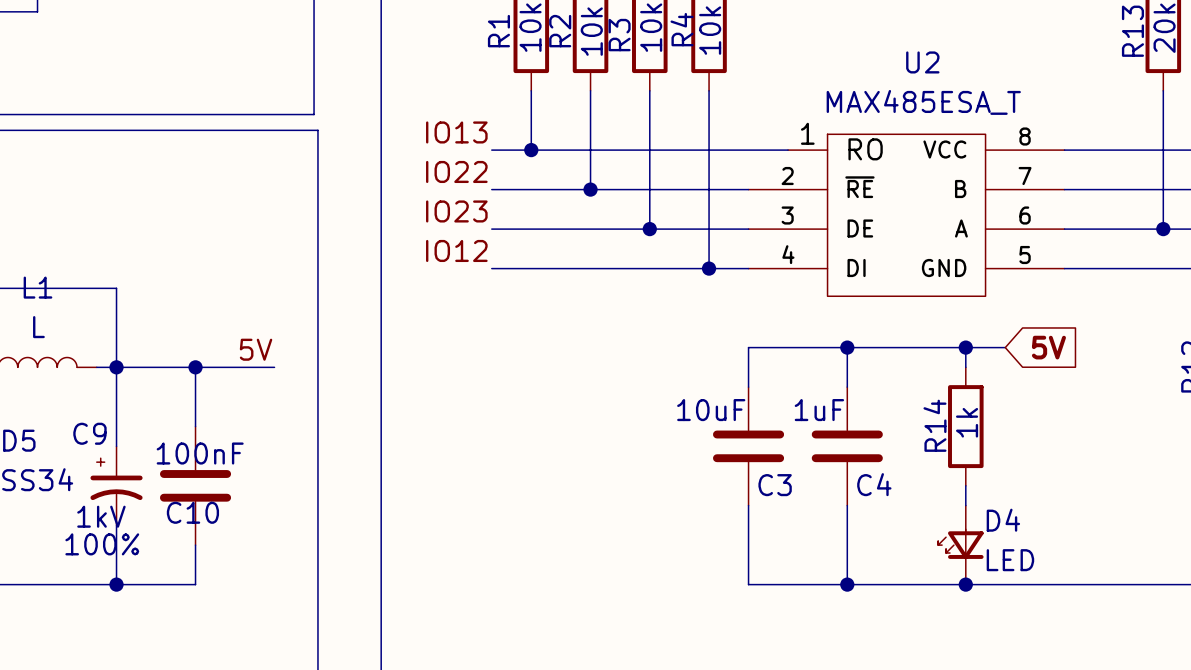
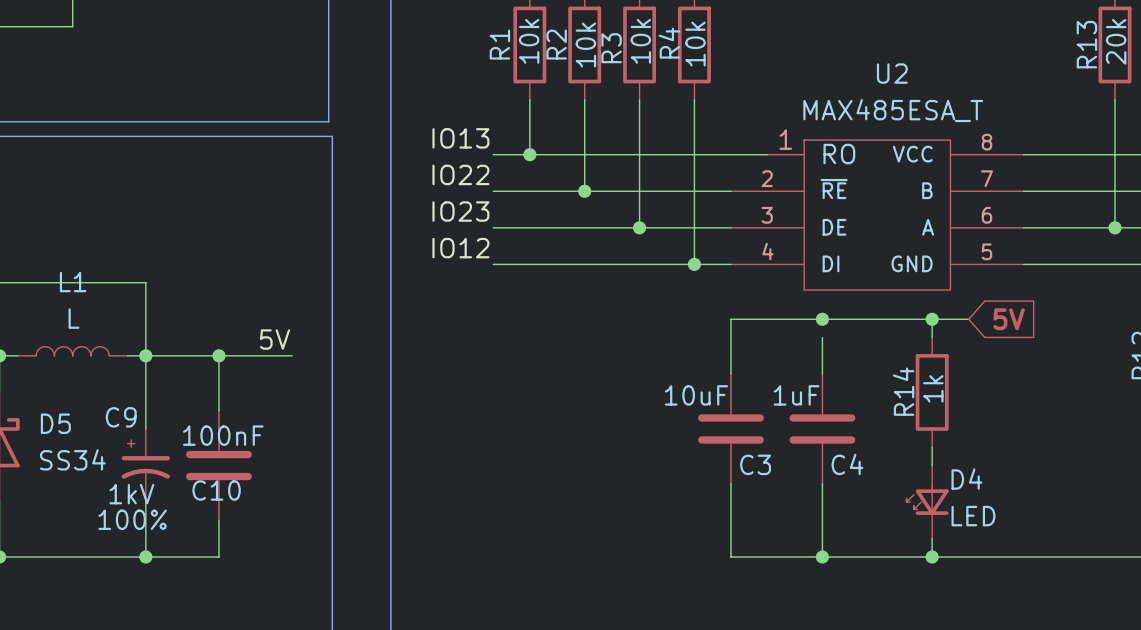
wire: (748, 347) (1005, 347) -> (731, 337) (731, 319) (968, 319)
junction position: (847, 347) -> (822, 319)
junction position: (965, 347) -> (932, 319)
global label position: 5V (1048, 347) -> 5V (1009, 319)
R14 position: (965, 426) -> (932, 392)
D4 position: (960, 545) -> (927, 502)

